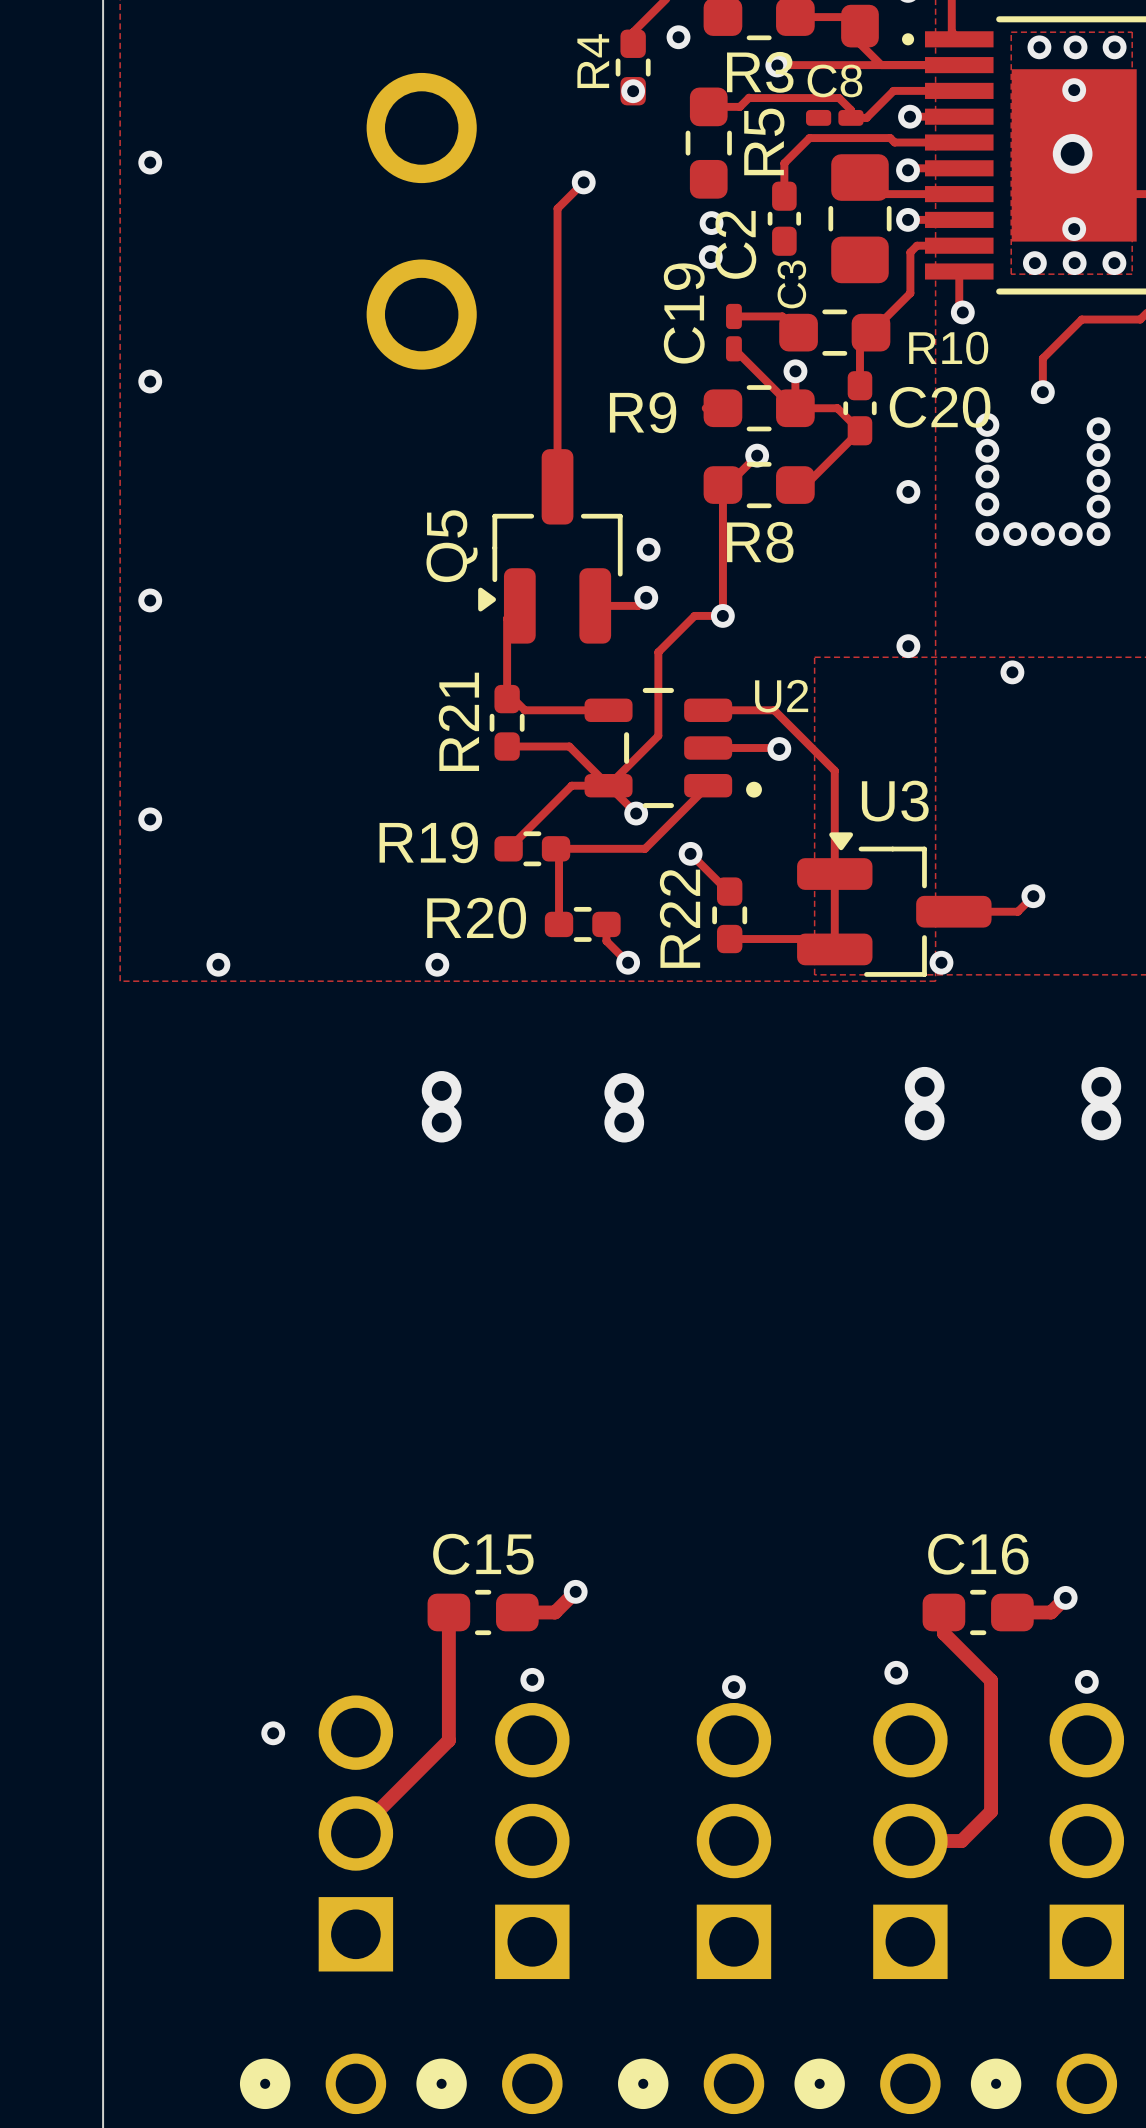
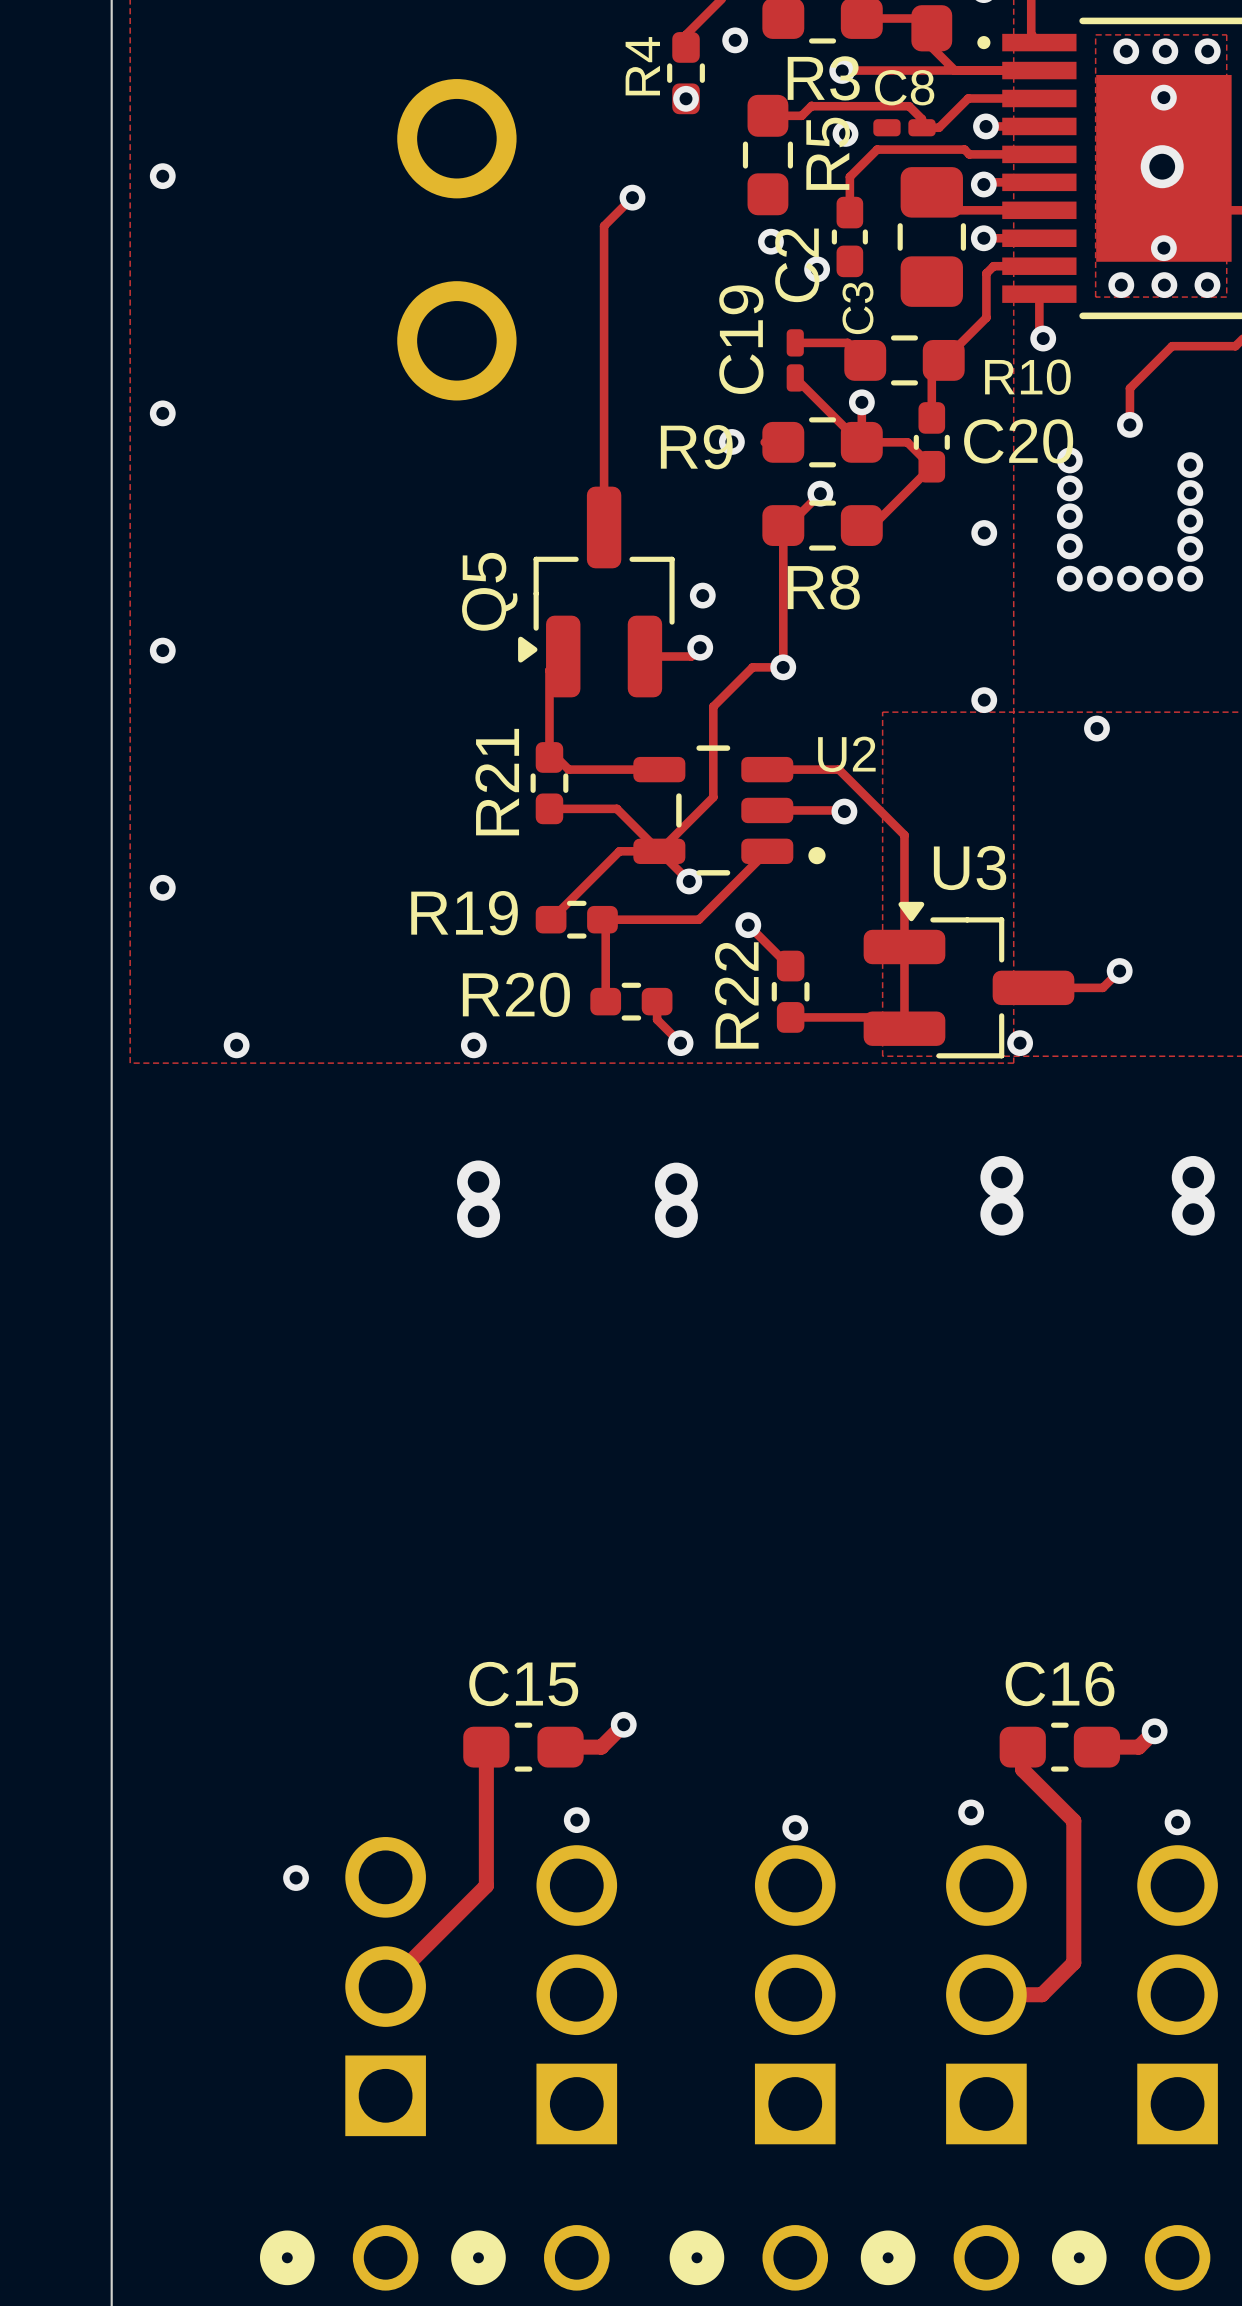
via: none -> (845, 133)
via position: (710, 257) -> (817, 269)
via: none -> (731, 441)

